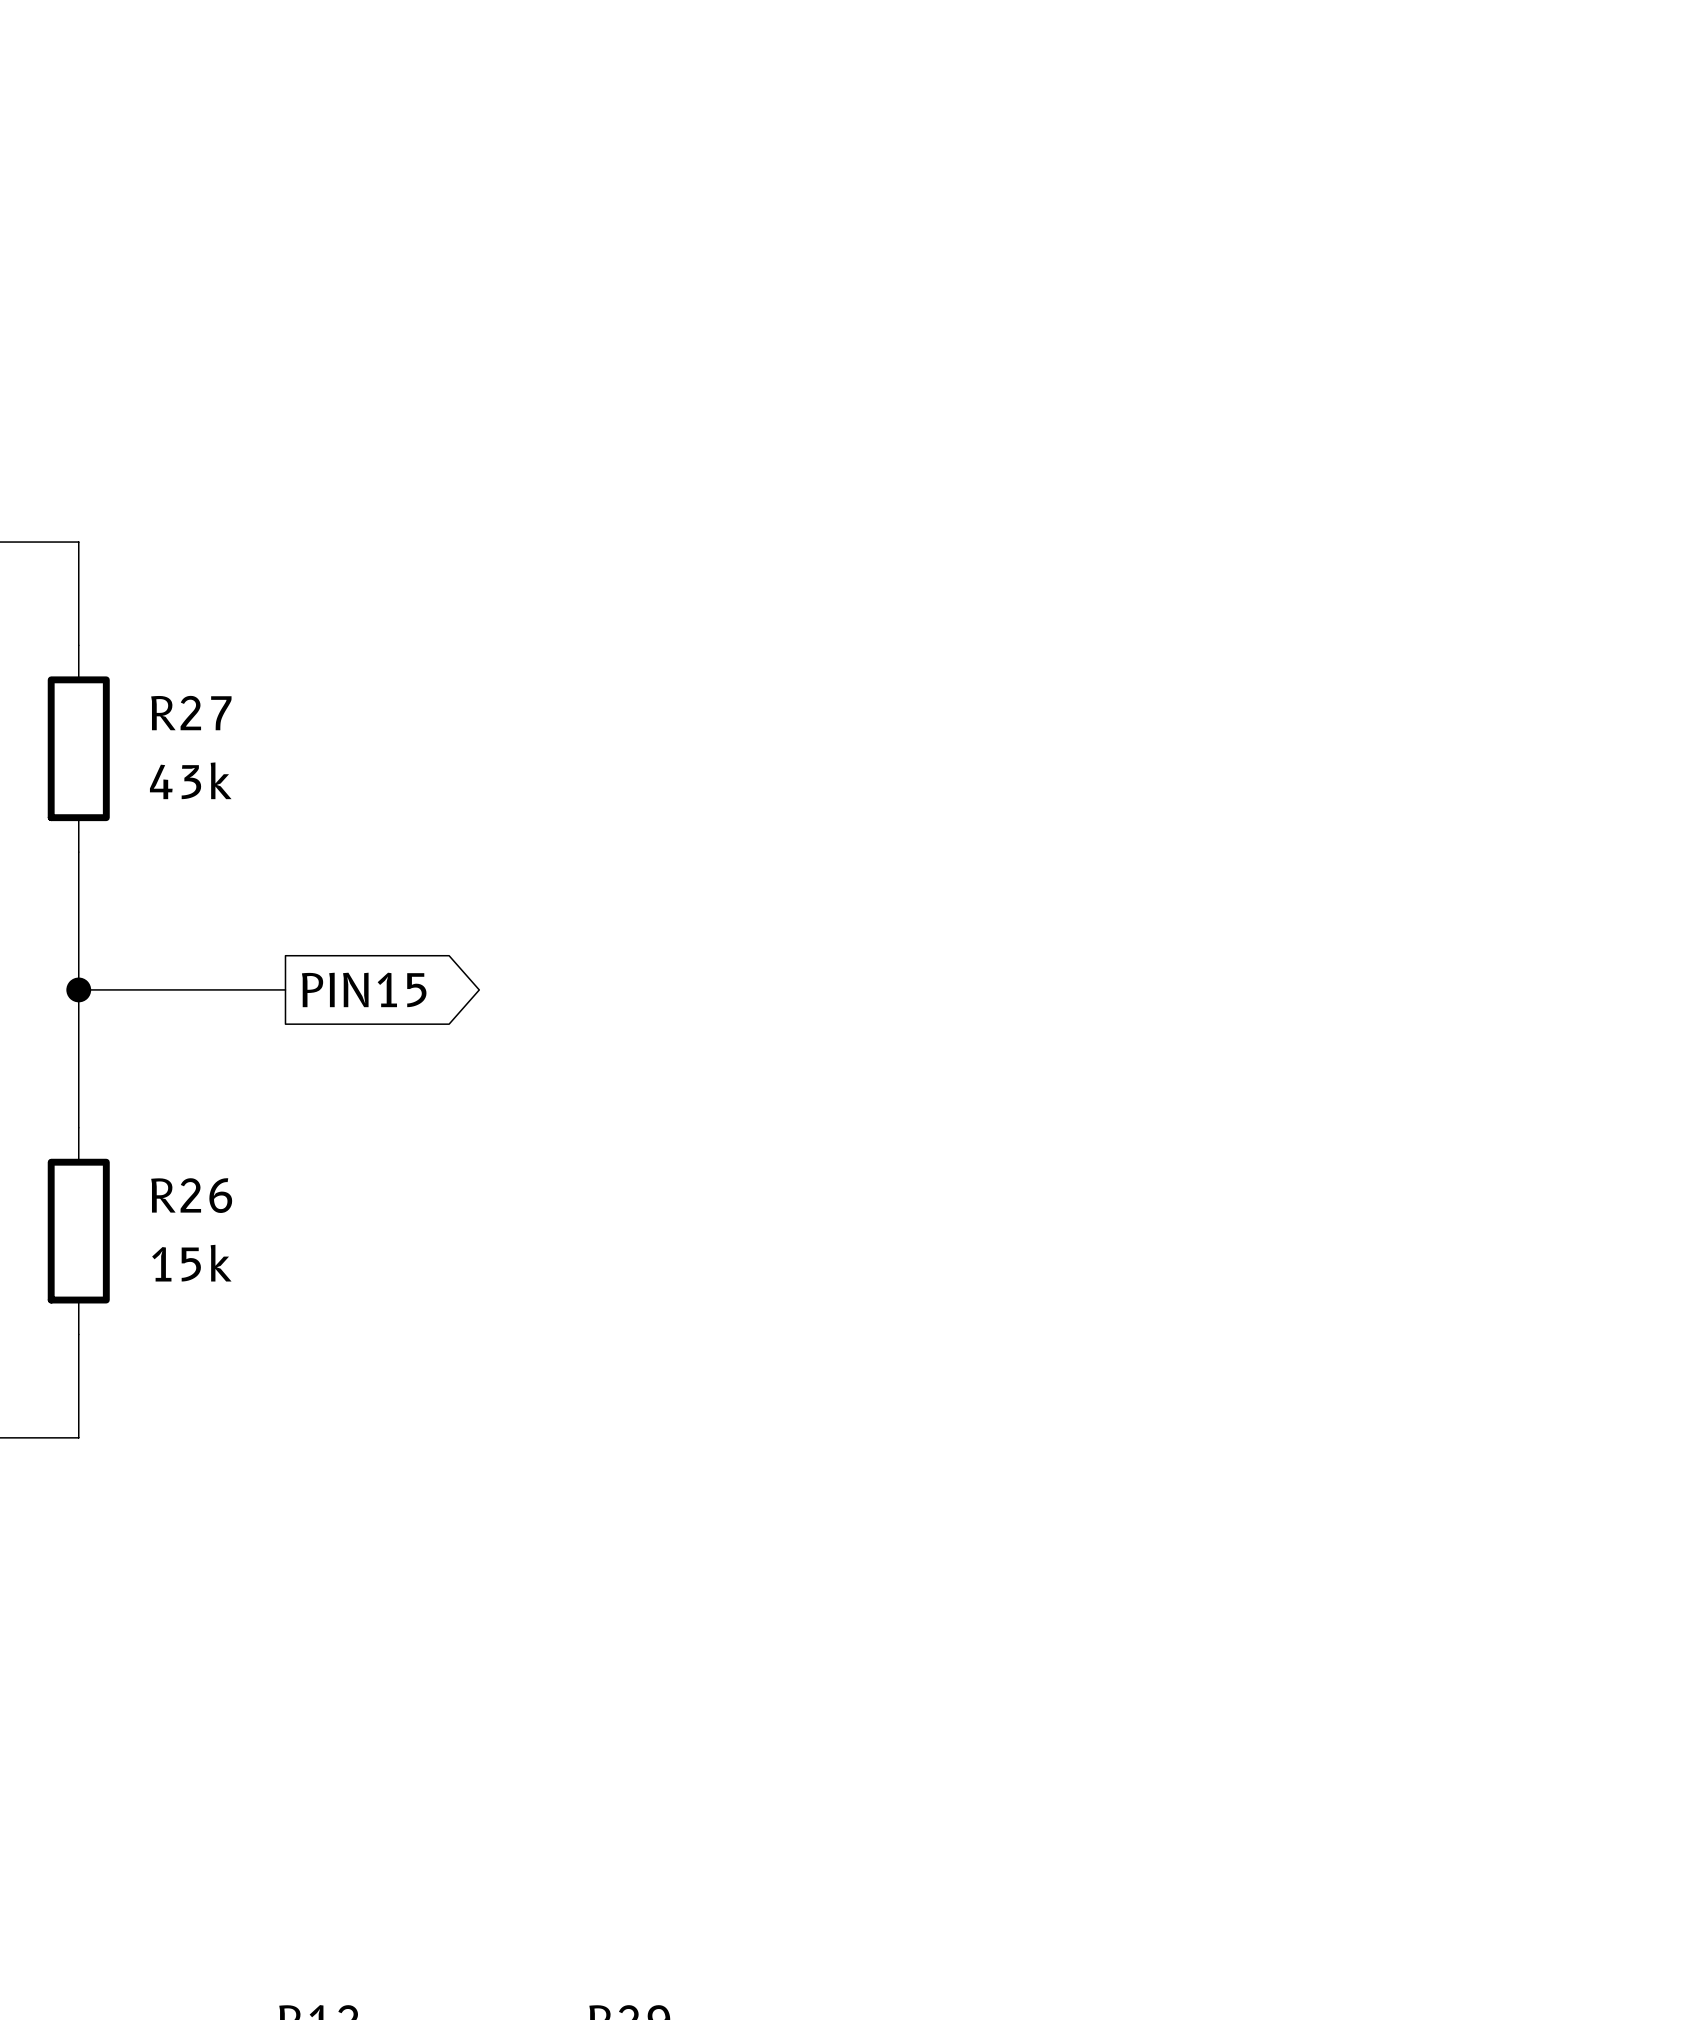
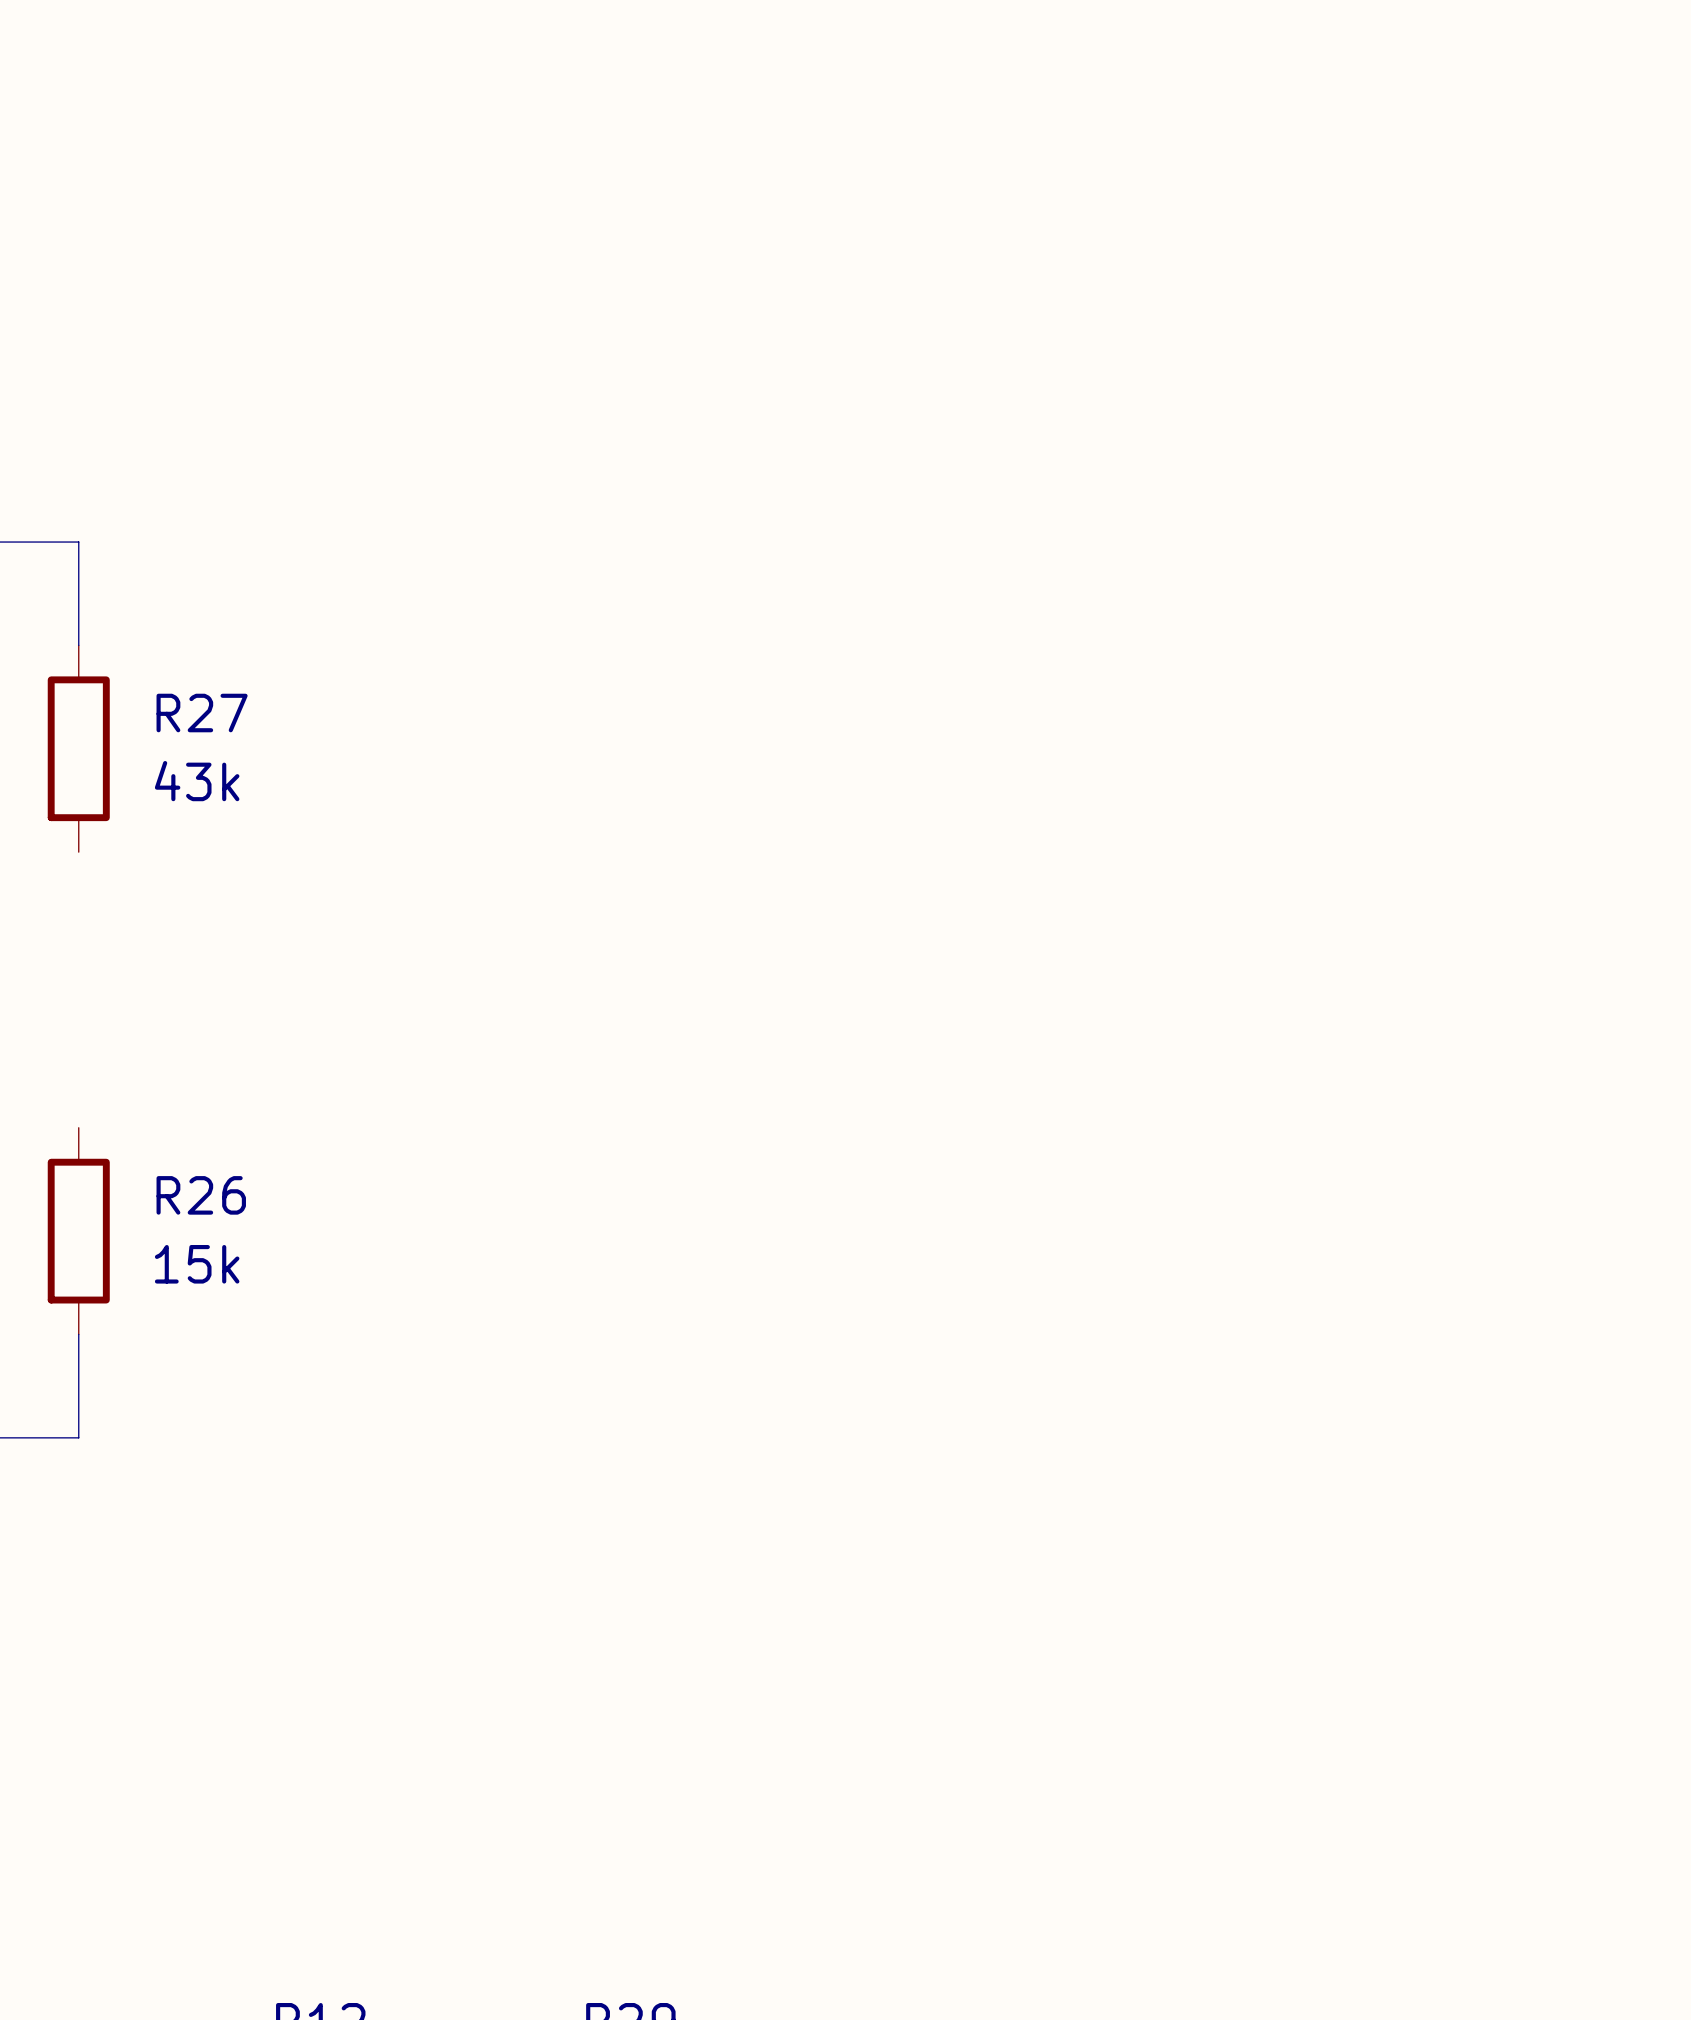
wire: (78, 852) (78, 1127) -> none
wire: (78, 989) (285, 989) -> none
junction: (78, 989) -> none
global label: PIN15 (364, 989) -> none

